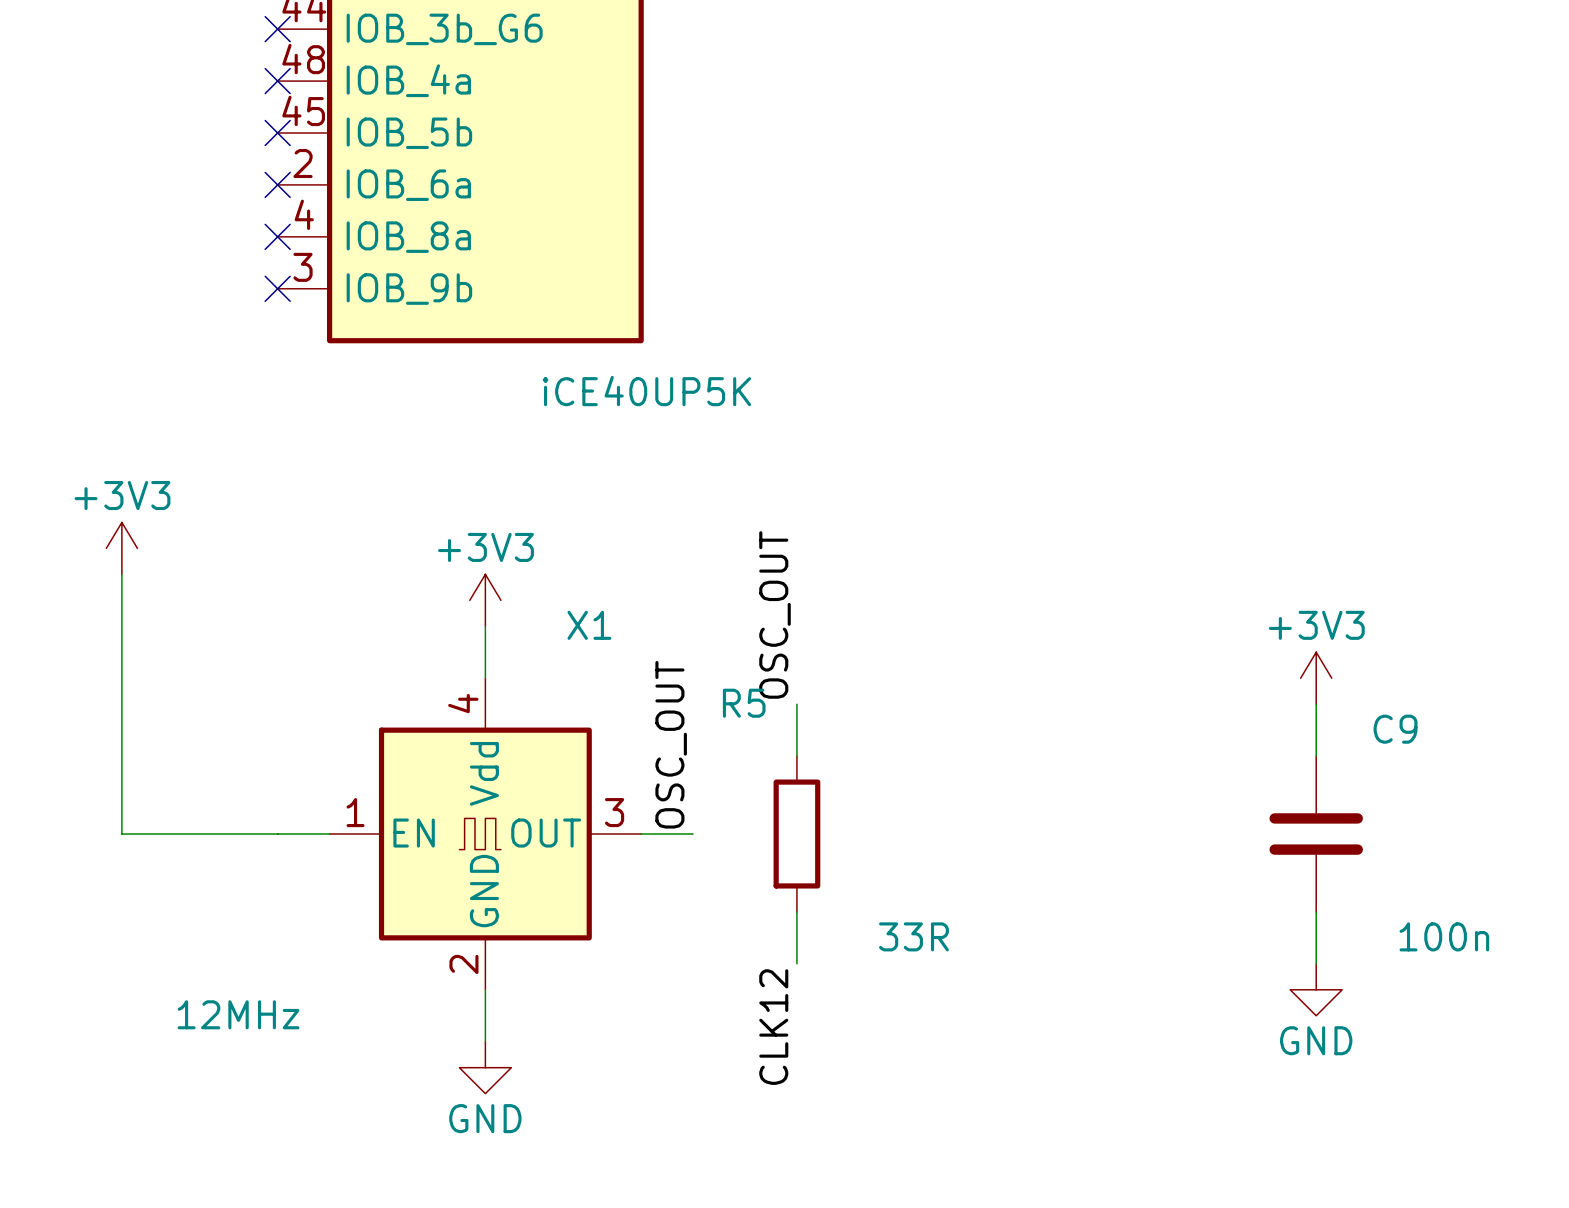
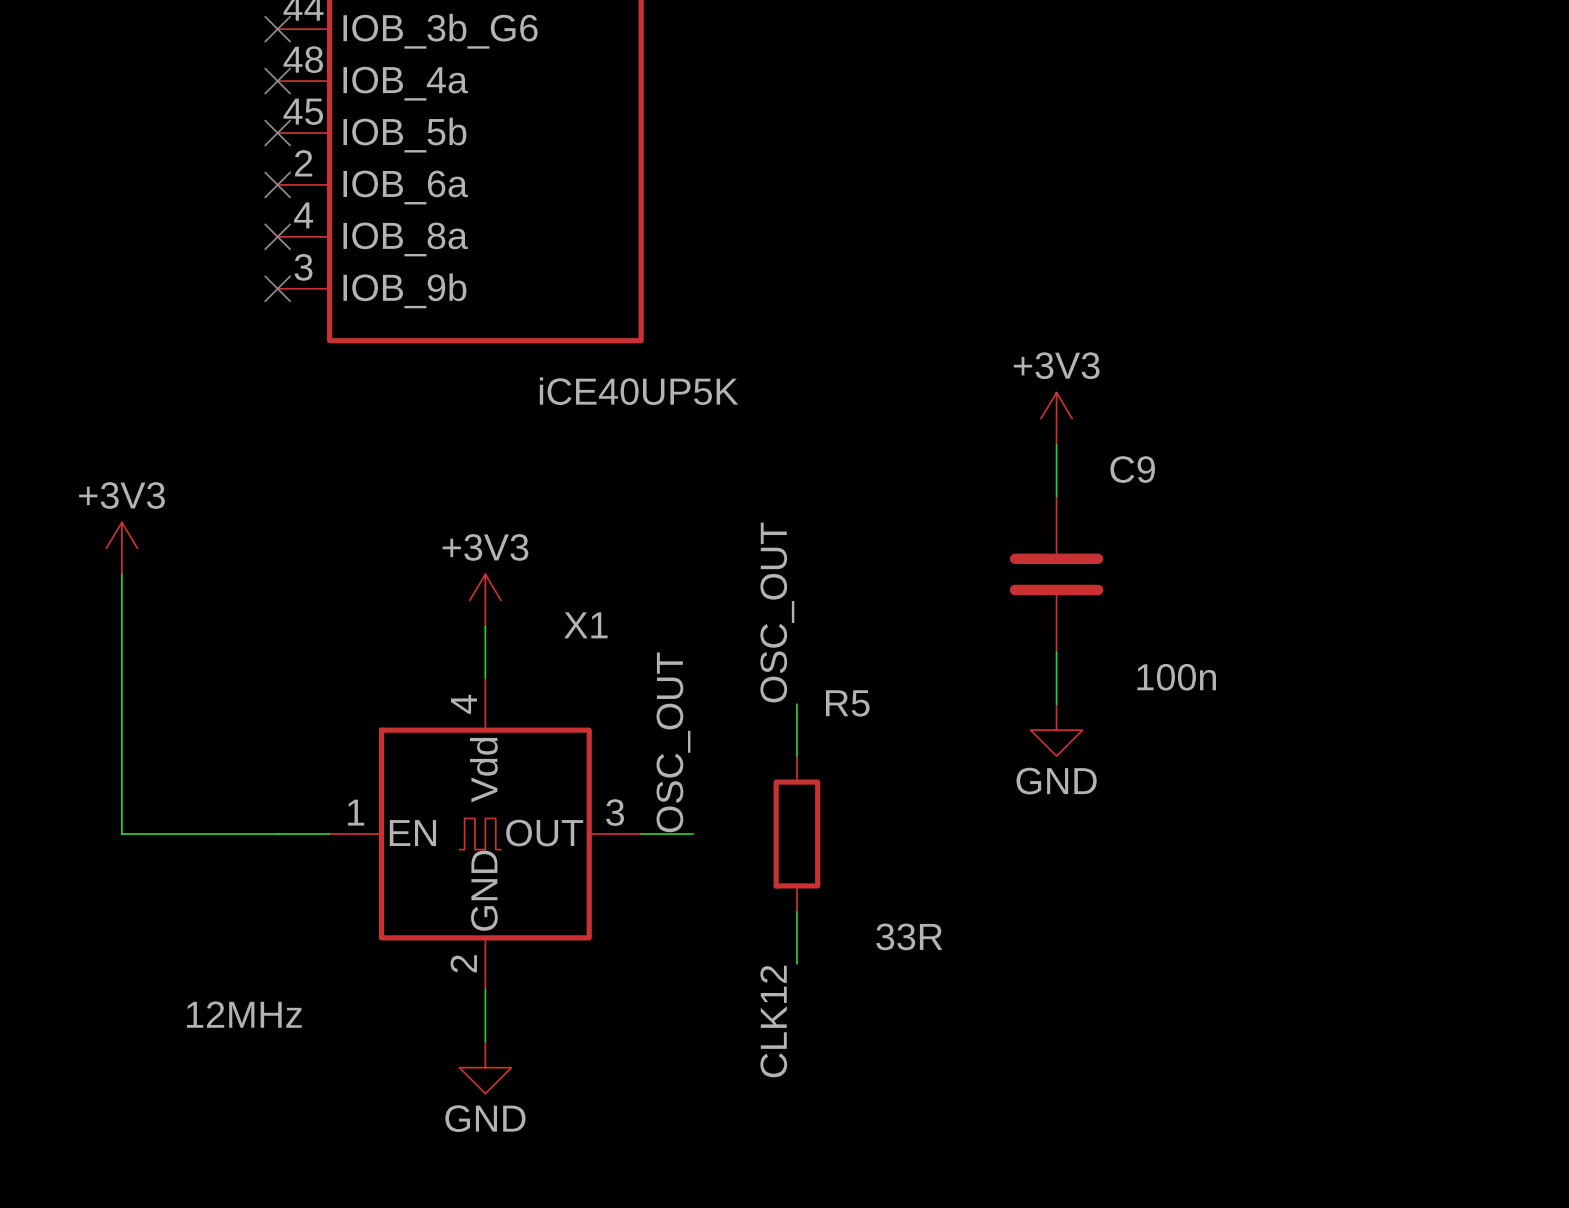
power symbol position: +3V3 (1316, 678) -> +3V3 (1056, 418)
R5 name position: R5 (744, 703) -> R5 (847, 703)
wire: (1316, 704) (1316, 756) -> (1056, 444) (1056, 496)
C9 position: (1316, 834) -> (1056, 574)
wire: (1316, 911) (1316, 963) -> (1056, 652) (1056, 704)
power symbol position: GND (1316, 989) -> GND (1056, 730)

